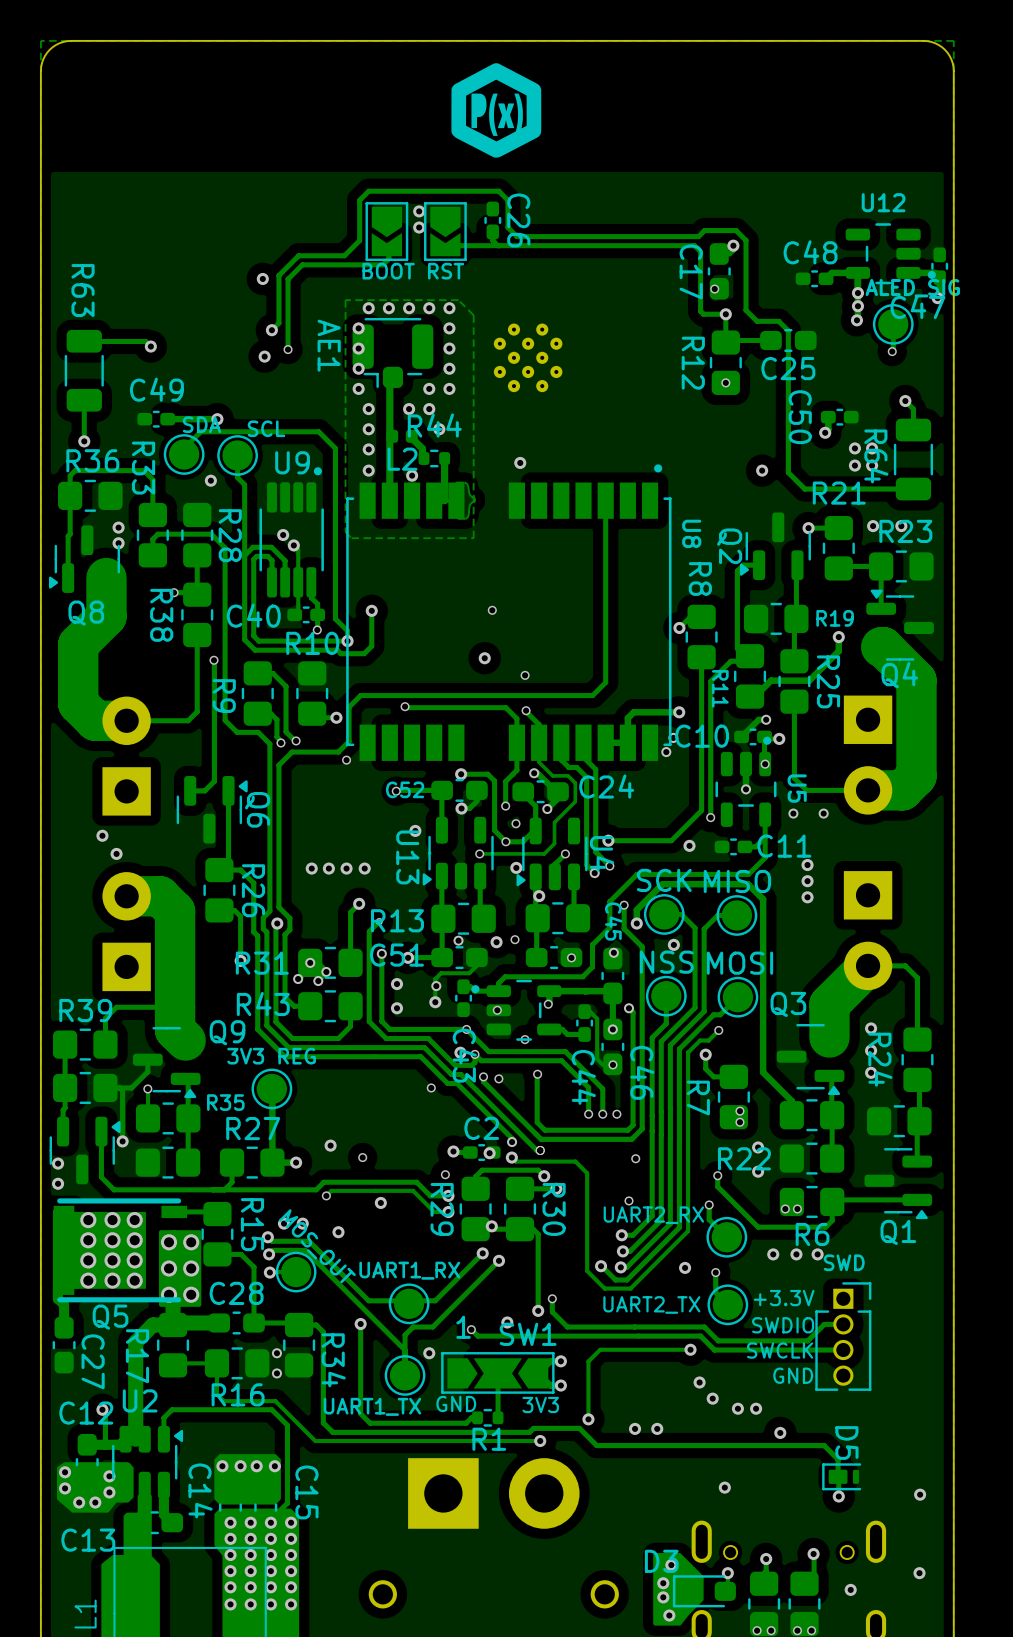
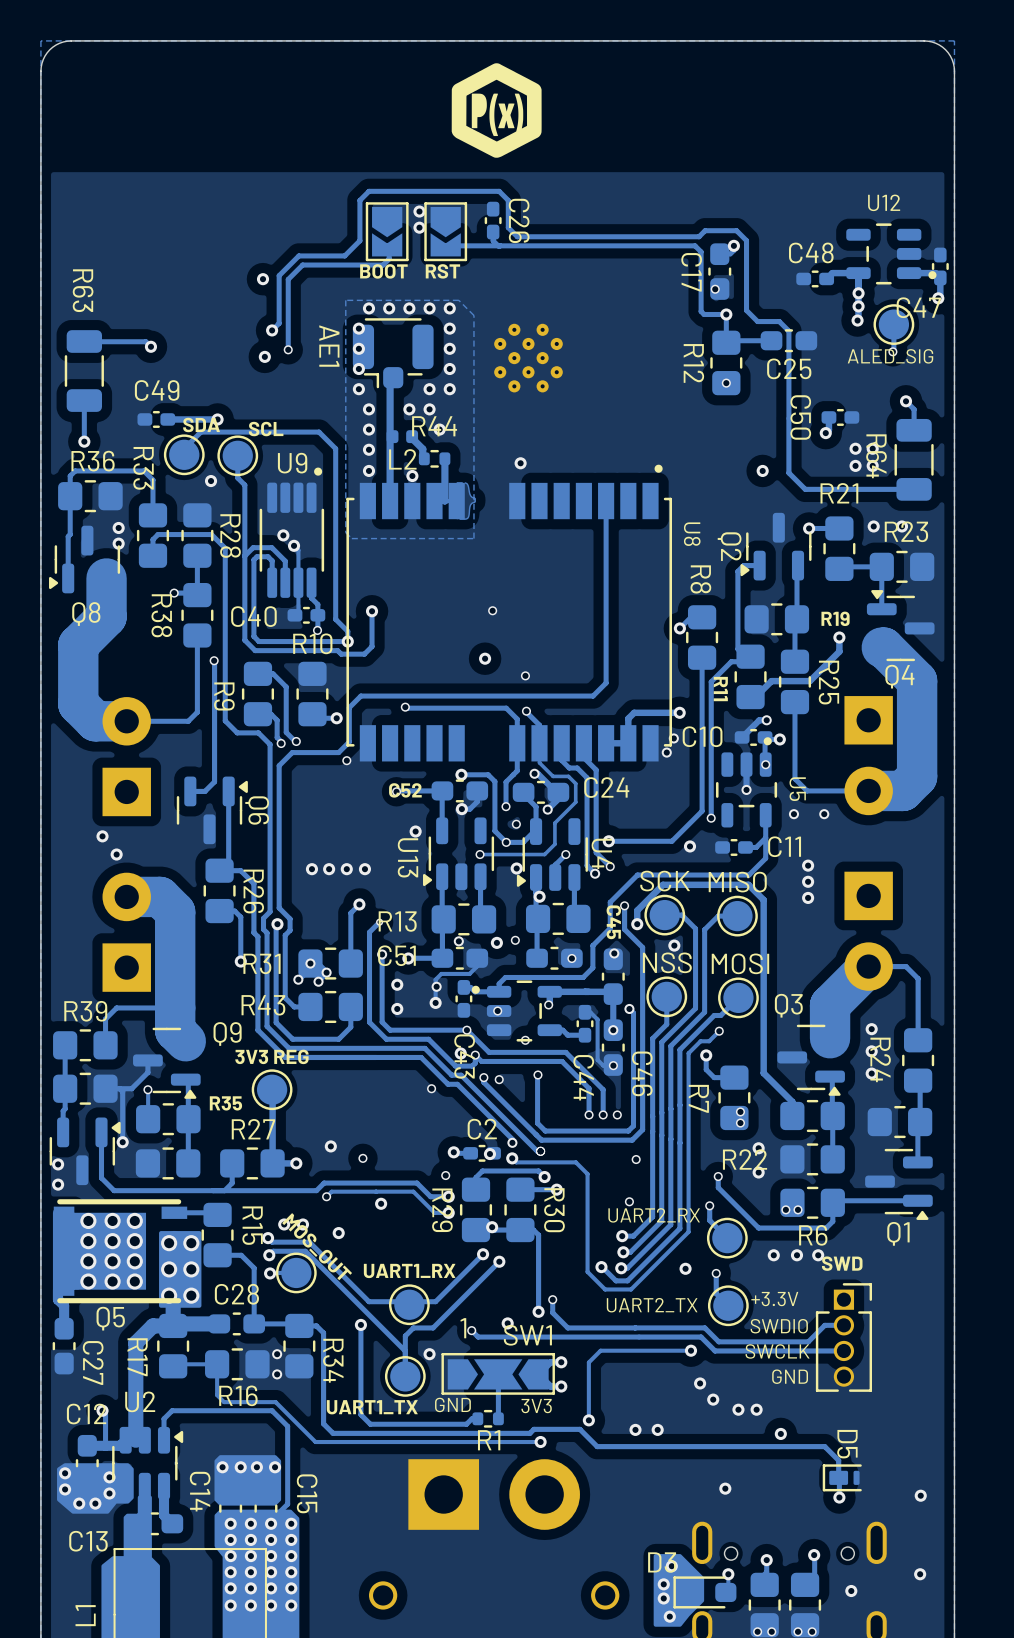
ALED_SIG name position: ALED_SIG (912, 288) -> ALED_SIG (890, 356)

